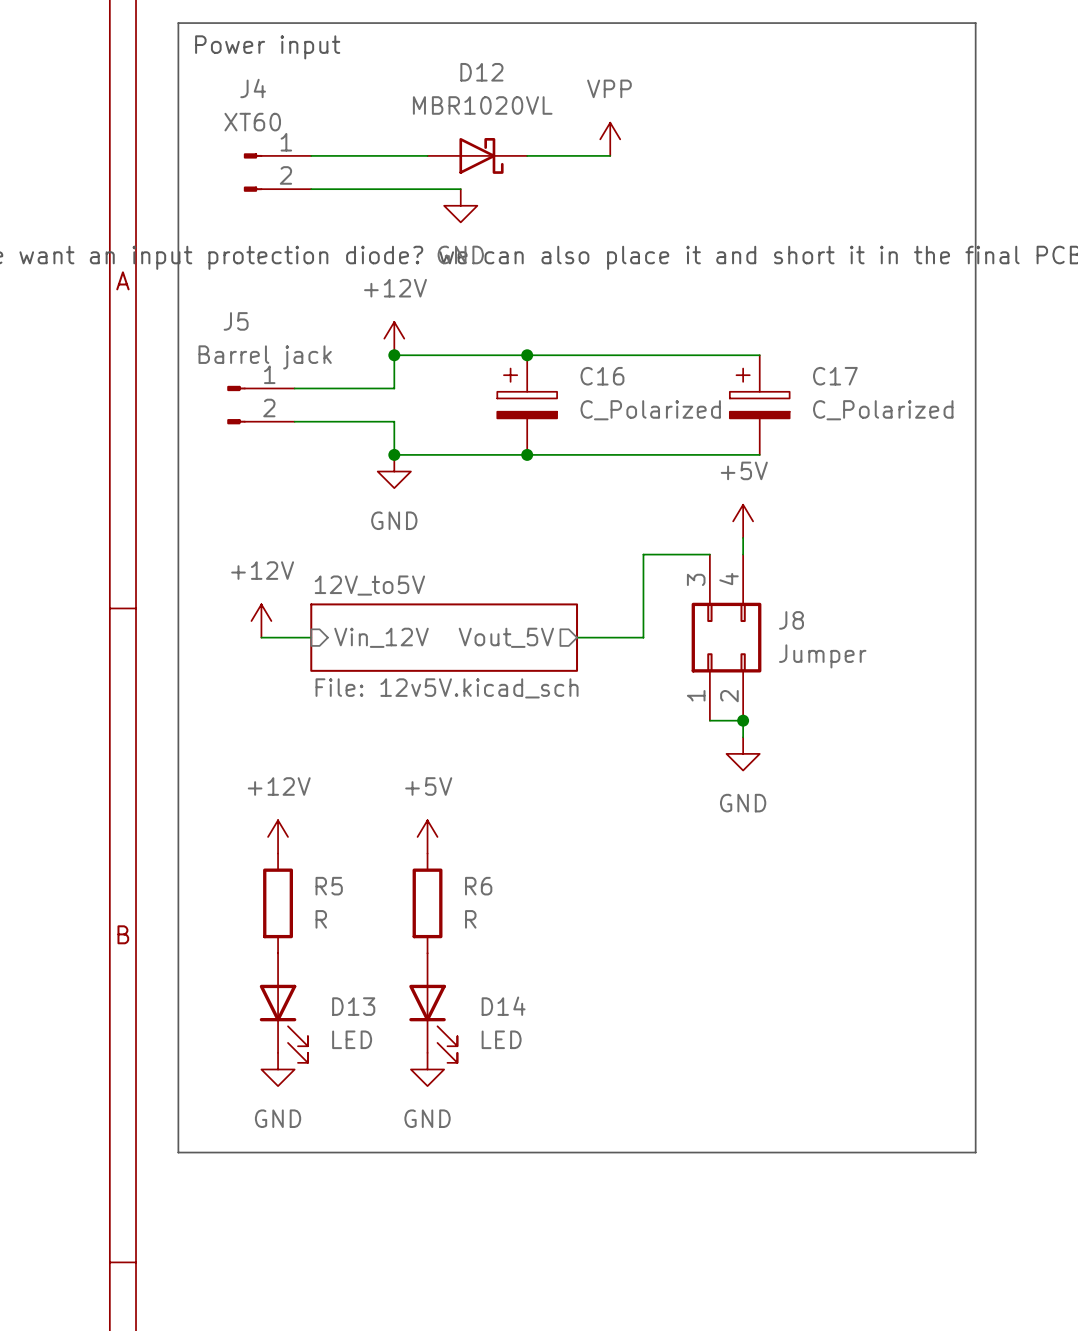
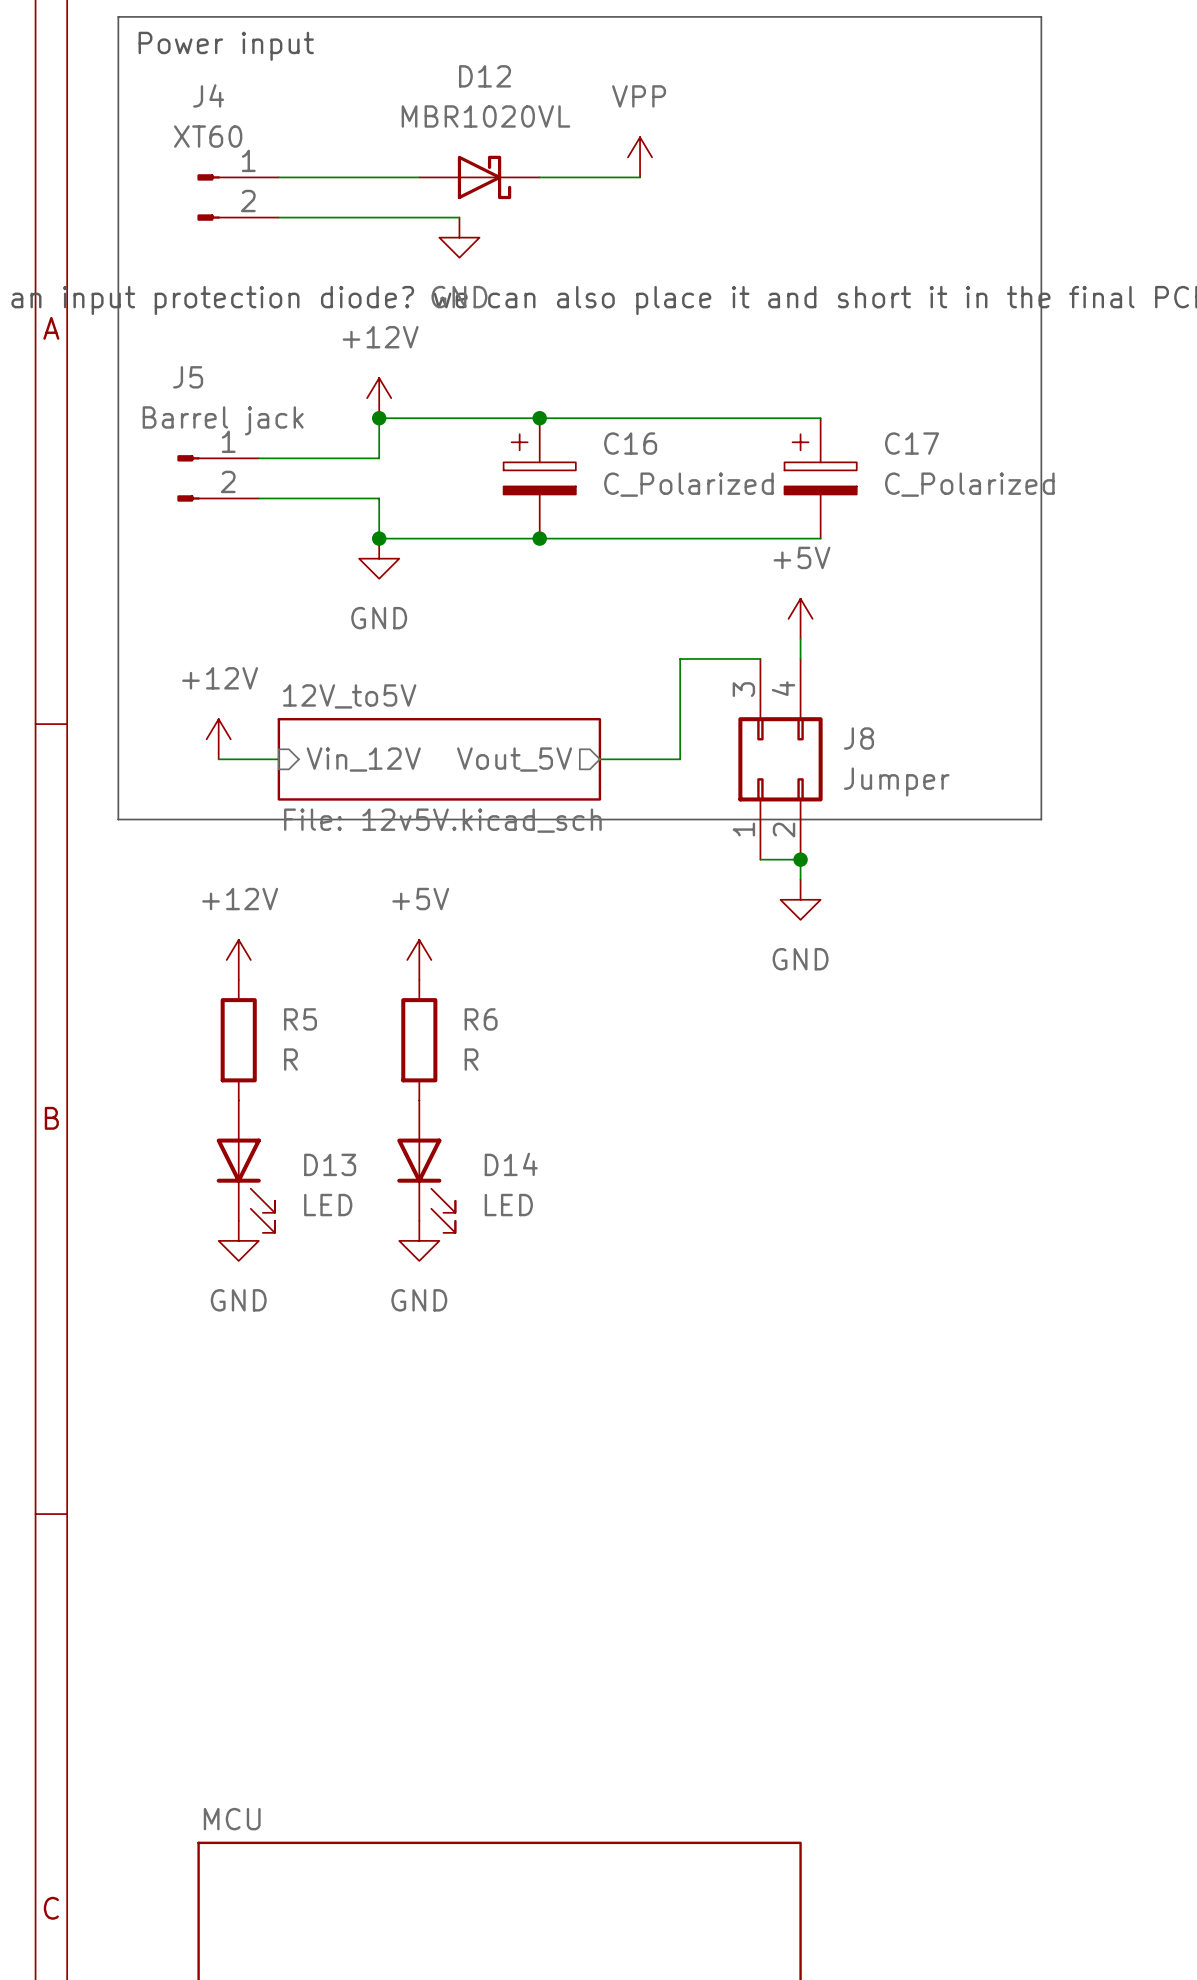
line: (942, 23) (975, 23) (975, 1152) (178, 1152) (178, 687) -> (1041, 16) (1041, 819) (118, 819)
power symbol position: +12V (278, 836) -> +12V (238, 959)
power symbol position: +5V (427, 836) -> +5V (419, 959)
R5 position: (278, 903) -> (238, 1040)
R6 position: (427, 903) -> (419, 1040)
D13 position: (283, 1008) -> (245, 1166)
D14 position: (433, 1008) -> (426, 1166)
power symbol position: GND (278, 1069) -> GND (238, 1240)
power symbol position: GND (427, 1069) -> GND (419, 1240)

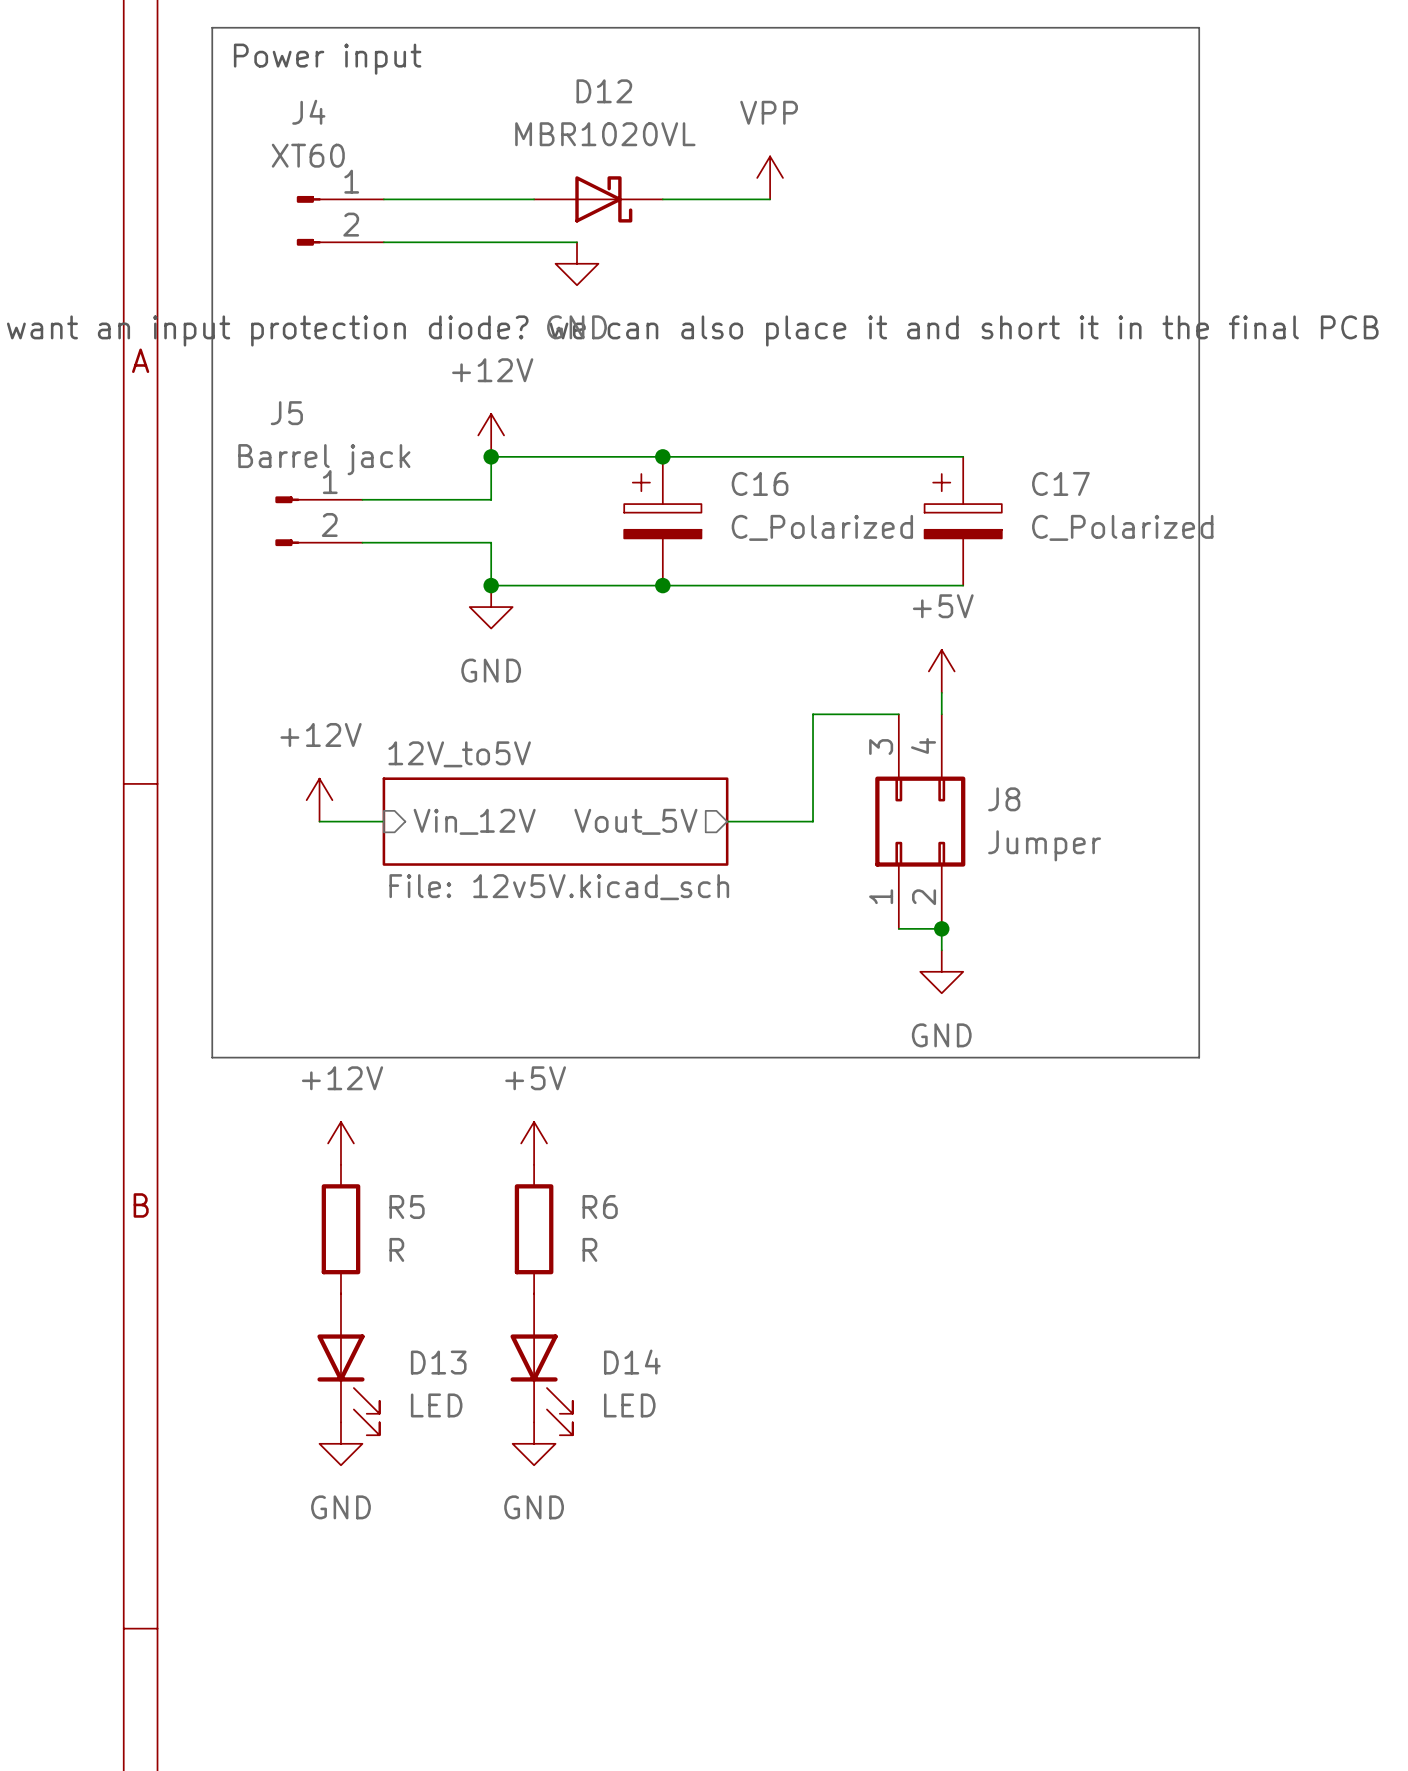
line: (118, 819) (1041, 819) -> (212, 885) (212, 1057) (1199, 1057) (1199, 885)
power symbol position: +12V (238, 959) -> +12V (340, 1143)
power symbol position: +5V (419, 959) -> +5V (534, 1143)
R5 position: (238, 1040) -> (340, 1229)
R6 position: (419, 1040) -> (534, 1229)
D13 position: (245, 1166) -> (348, 1364)
D14 position: (426, 1166) -> (541, 1364)
power symbol position: GND (238, 1240) -> GND (340, 1443)
power symbol position: GND (419, 1240) -> GND (534, 1443)

